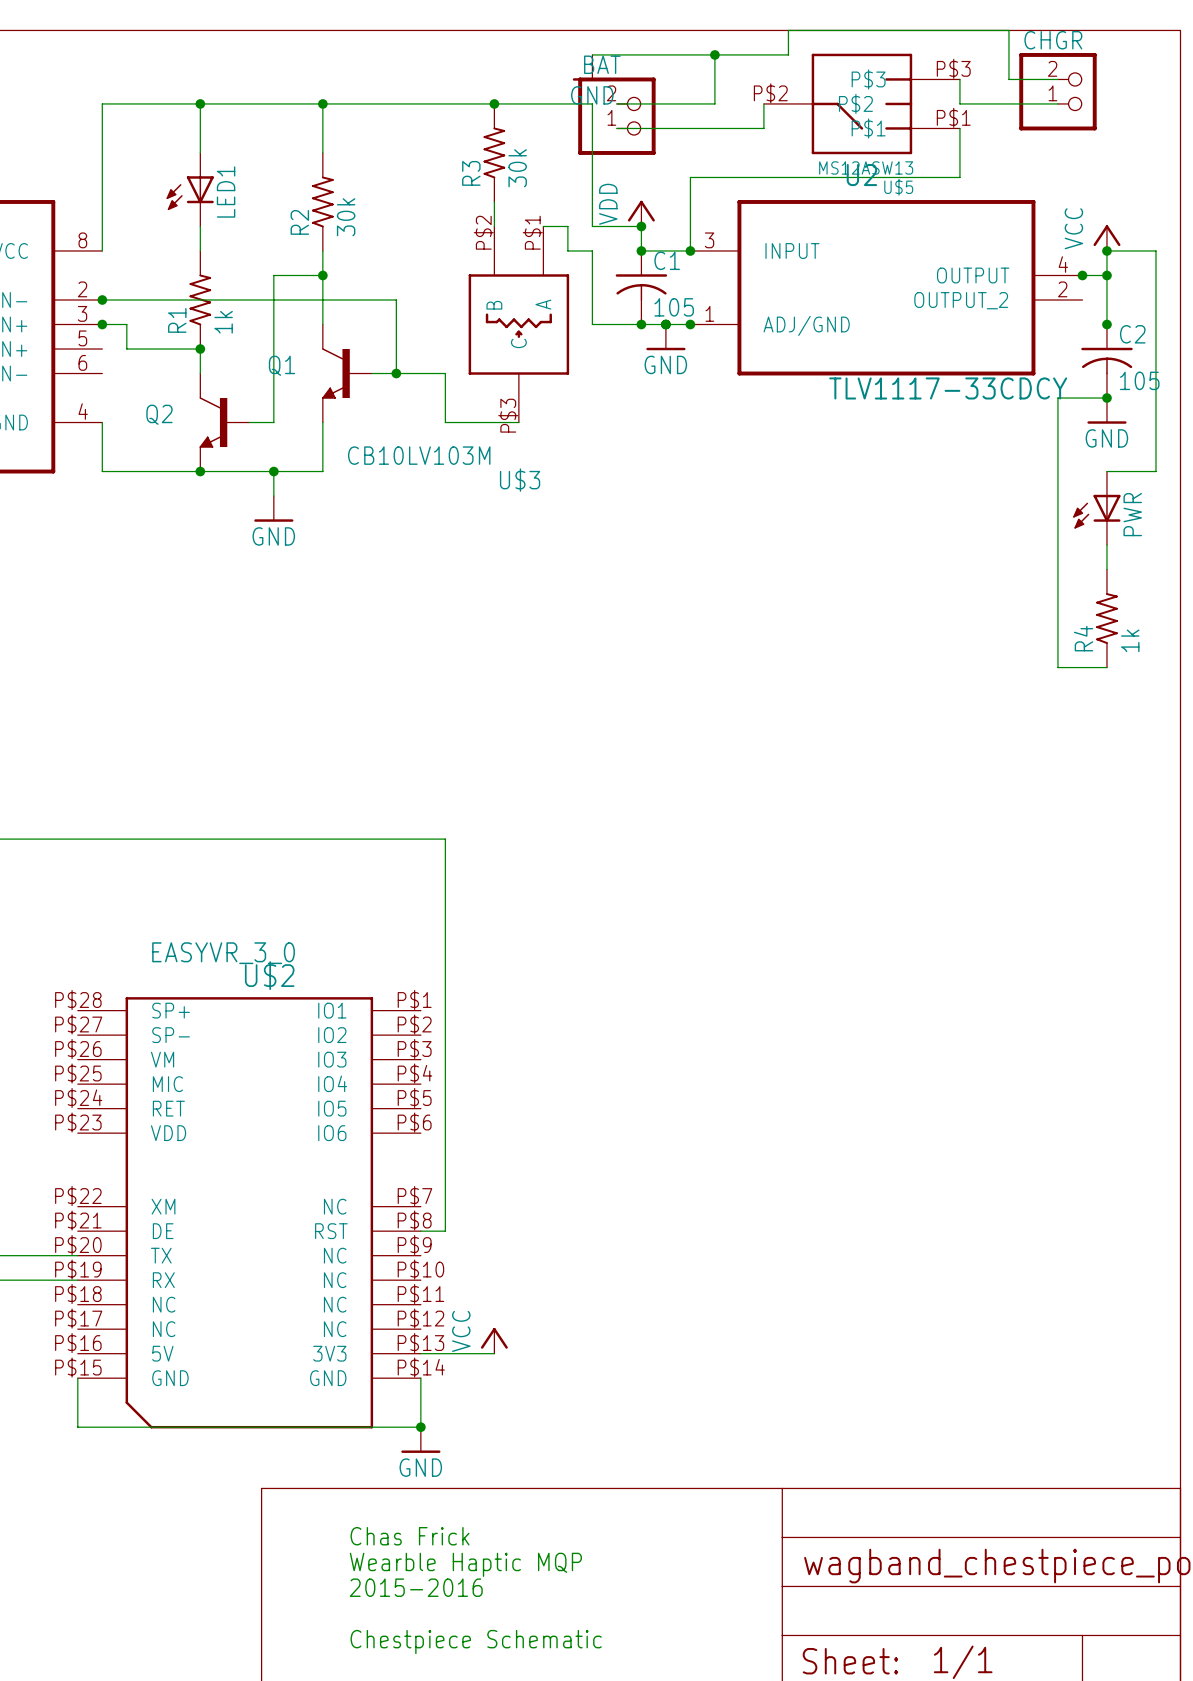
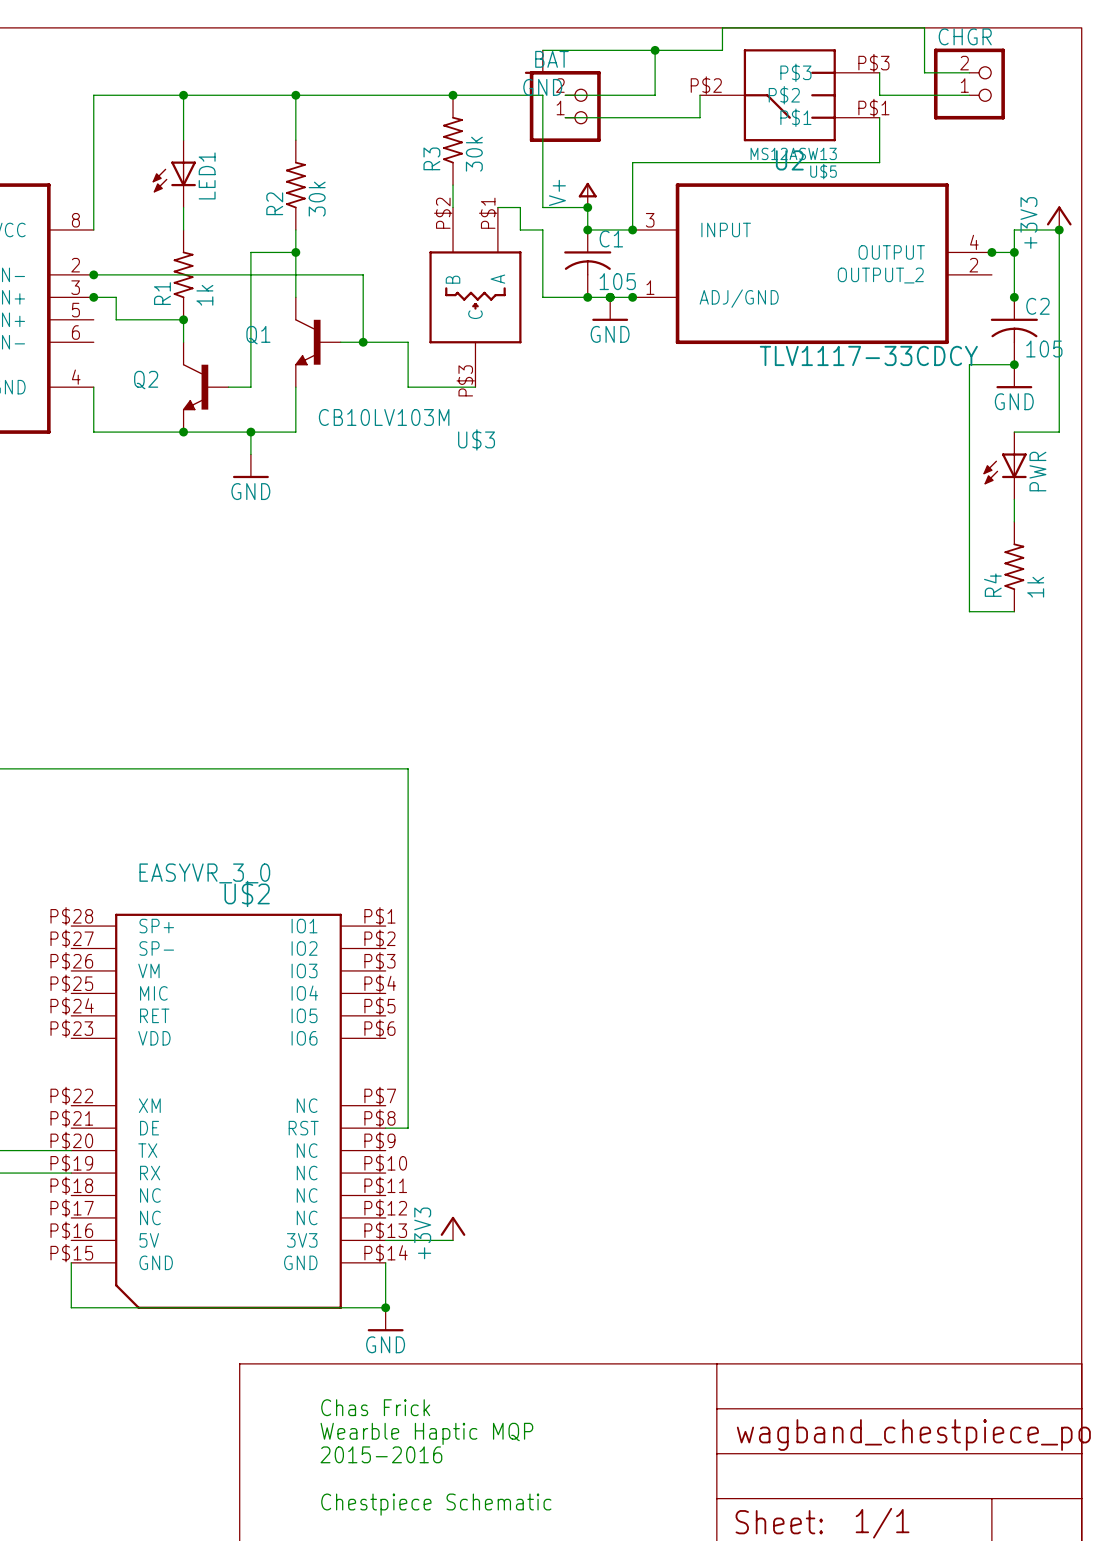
power symbol: VDD (641, 213) -> V+ (587, 195)
power symbol: VCC (1106, 238) -> none
power symbol: none -> +3V3 (1059, 218)
junction position: (1106, 250) -> (1059, 229)
power symbol: VCC (494, 1340) -> +3V3 (453, 1228)

